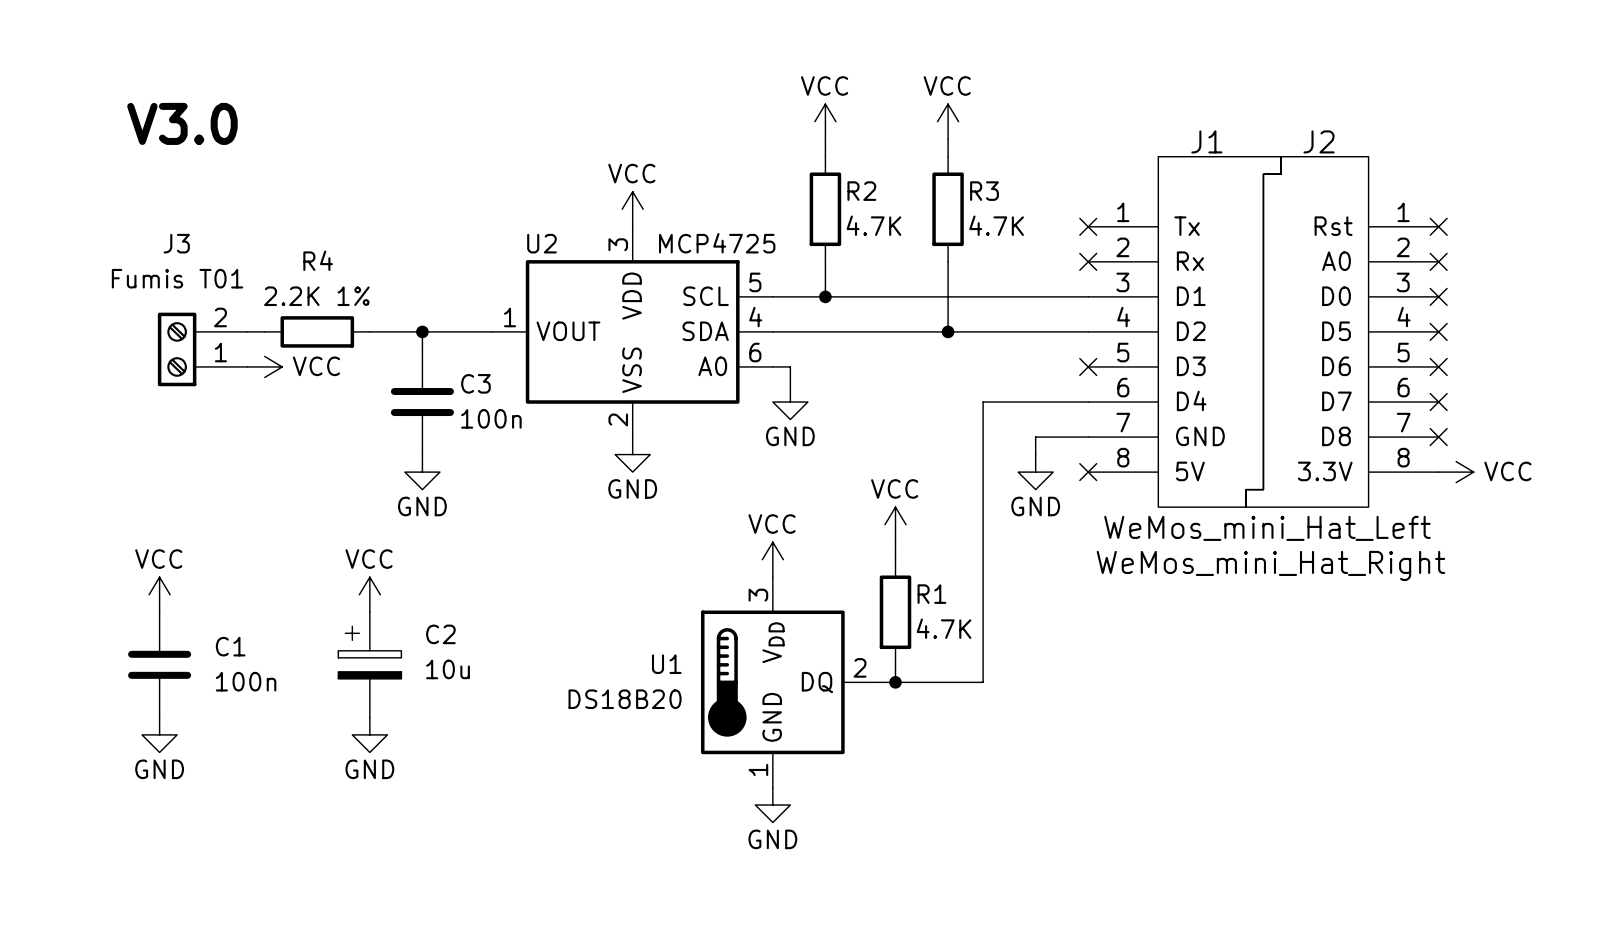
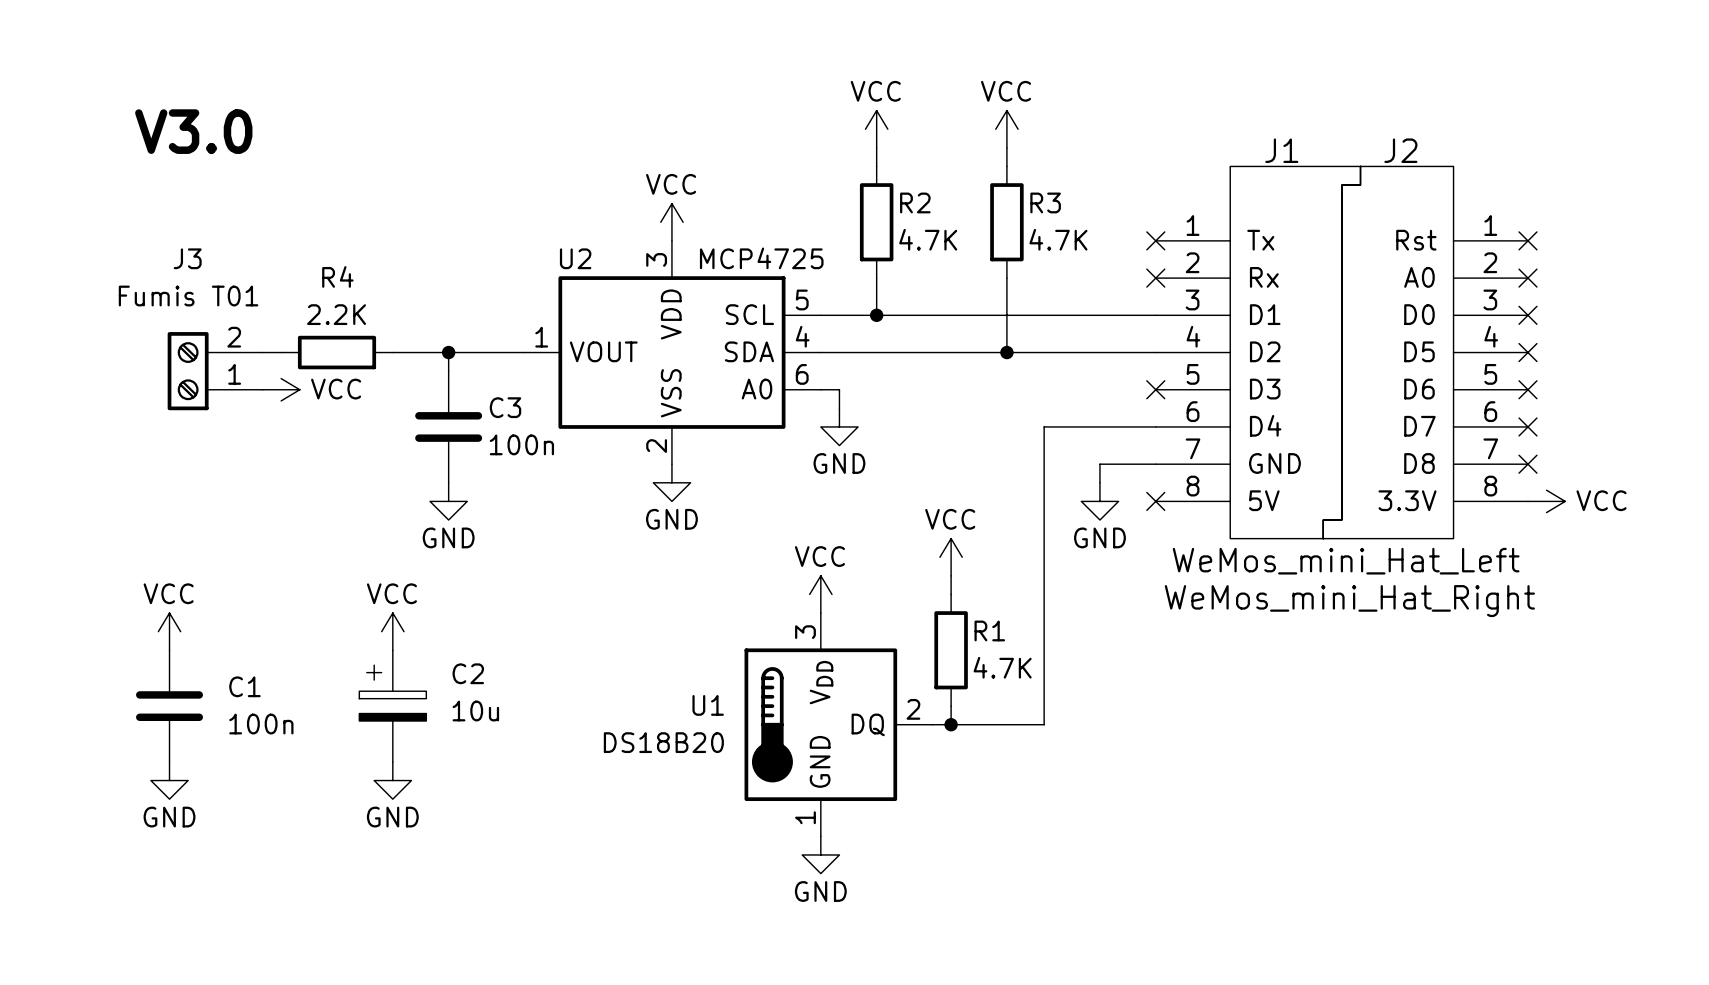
R4 value: 2.2K 1% (316, 296) -> 2.2K (336, 314)

